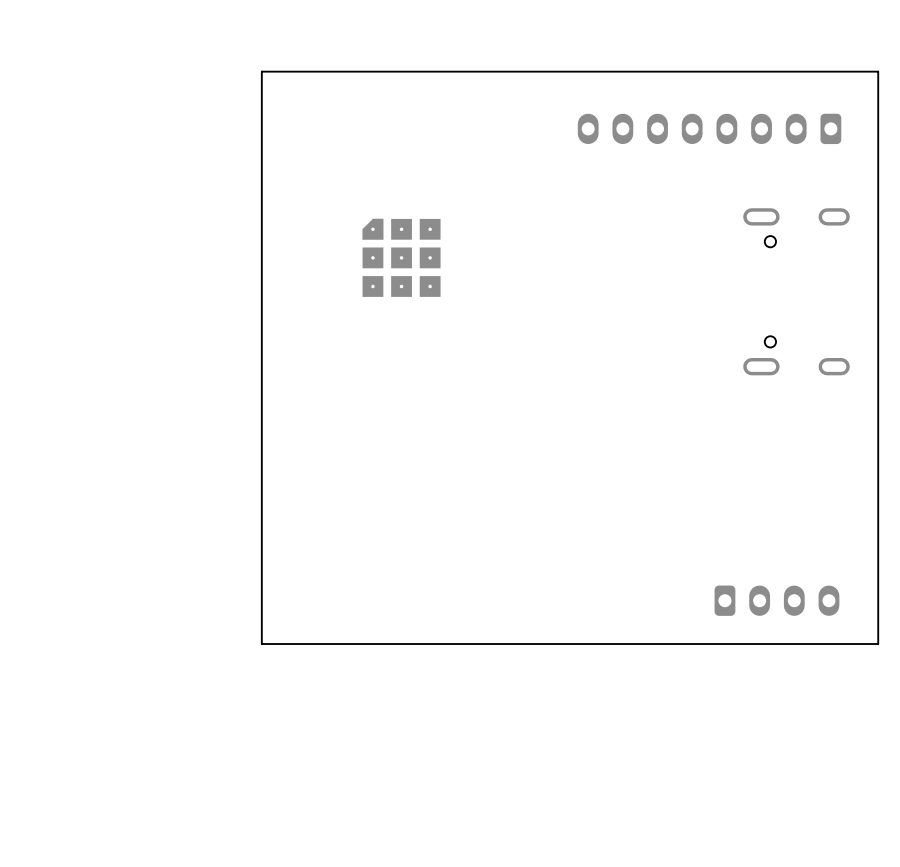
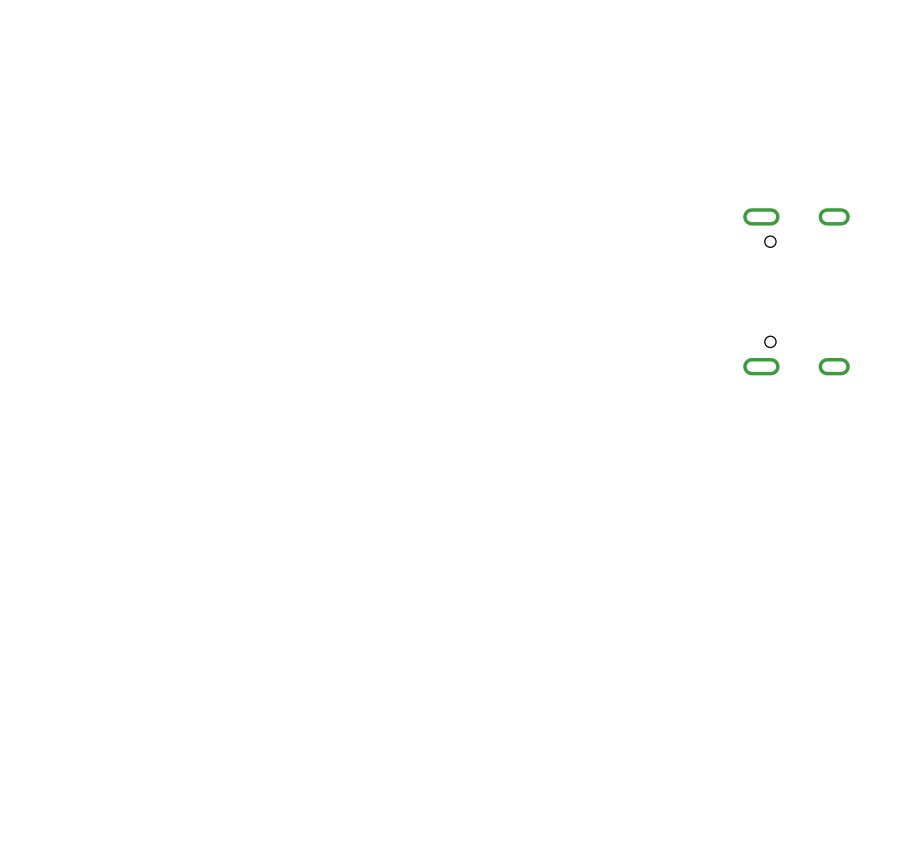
board edge: (878, 71) (261, 71) (261, 644) (878, 644) (878, 71) -> none
part: (709, 128) -> none
part: (401, 257) -> none
part: (776, 600) -> none

